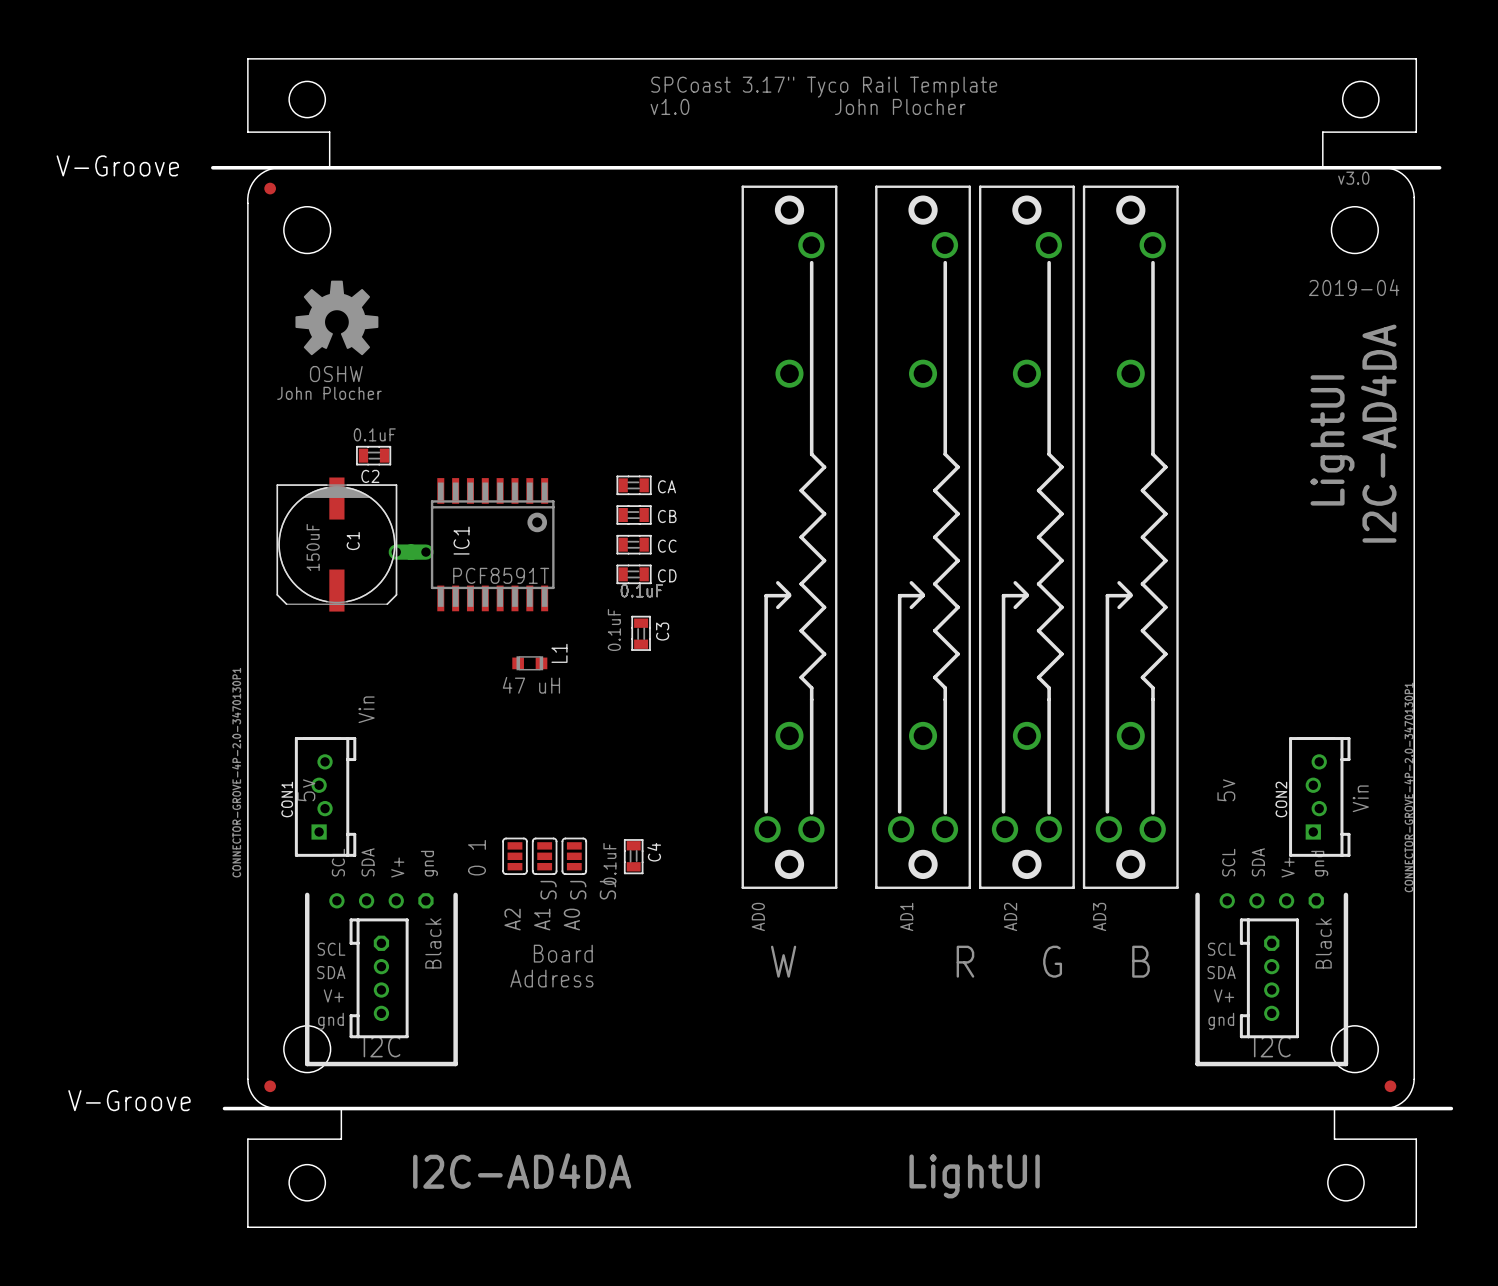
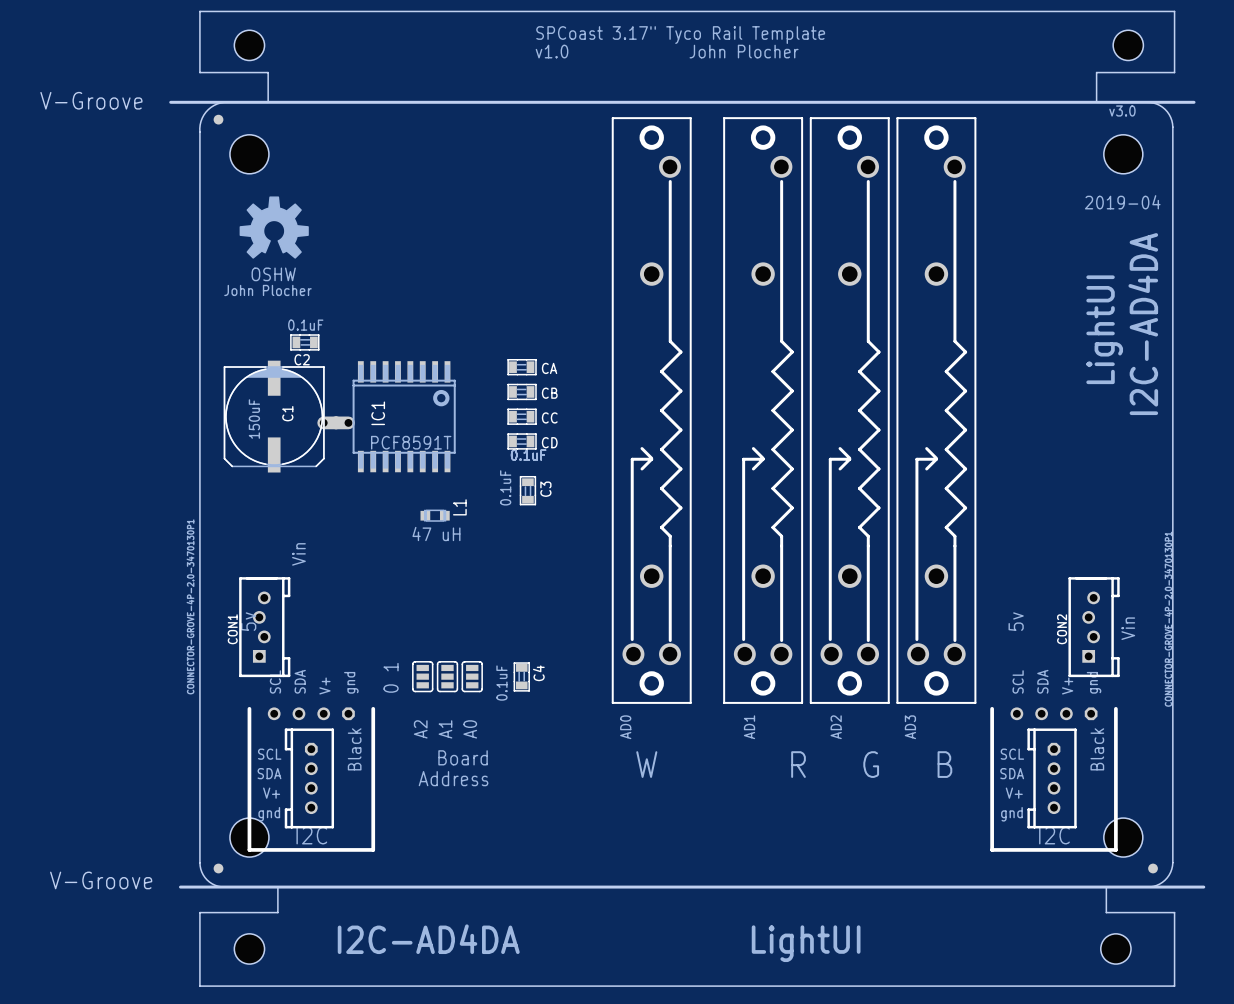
A2 value: SJ (548, 890) -> none
A1 value: SJ (578, 890) -> none
A0 value: SJ (607, 890) -> none

